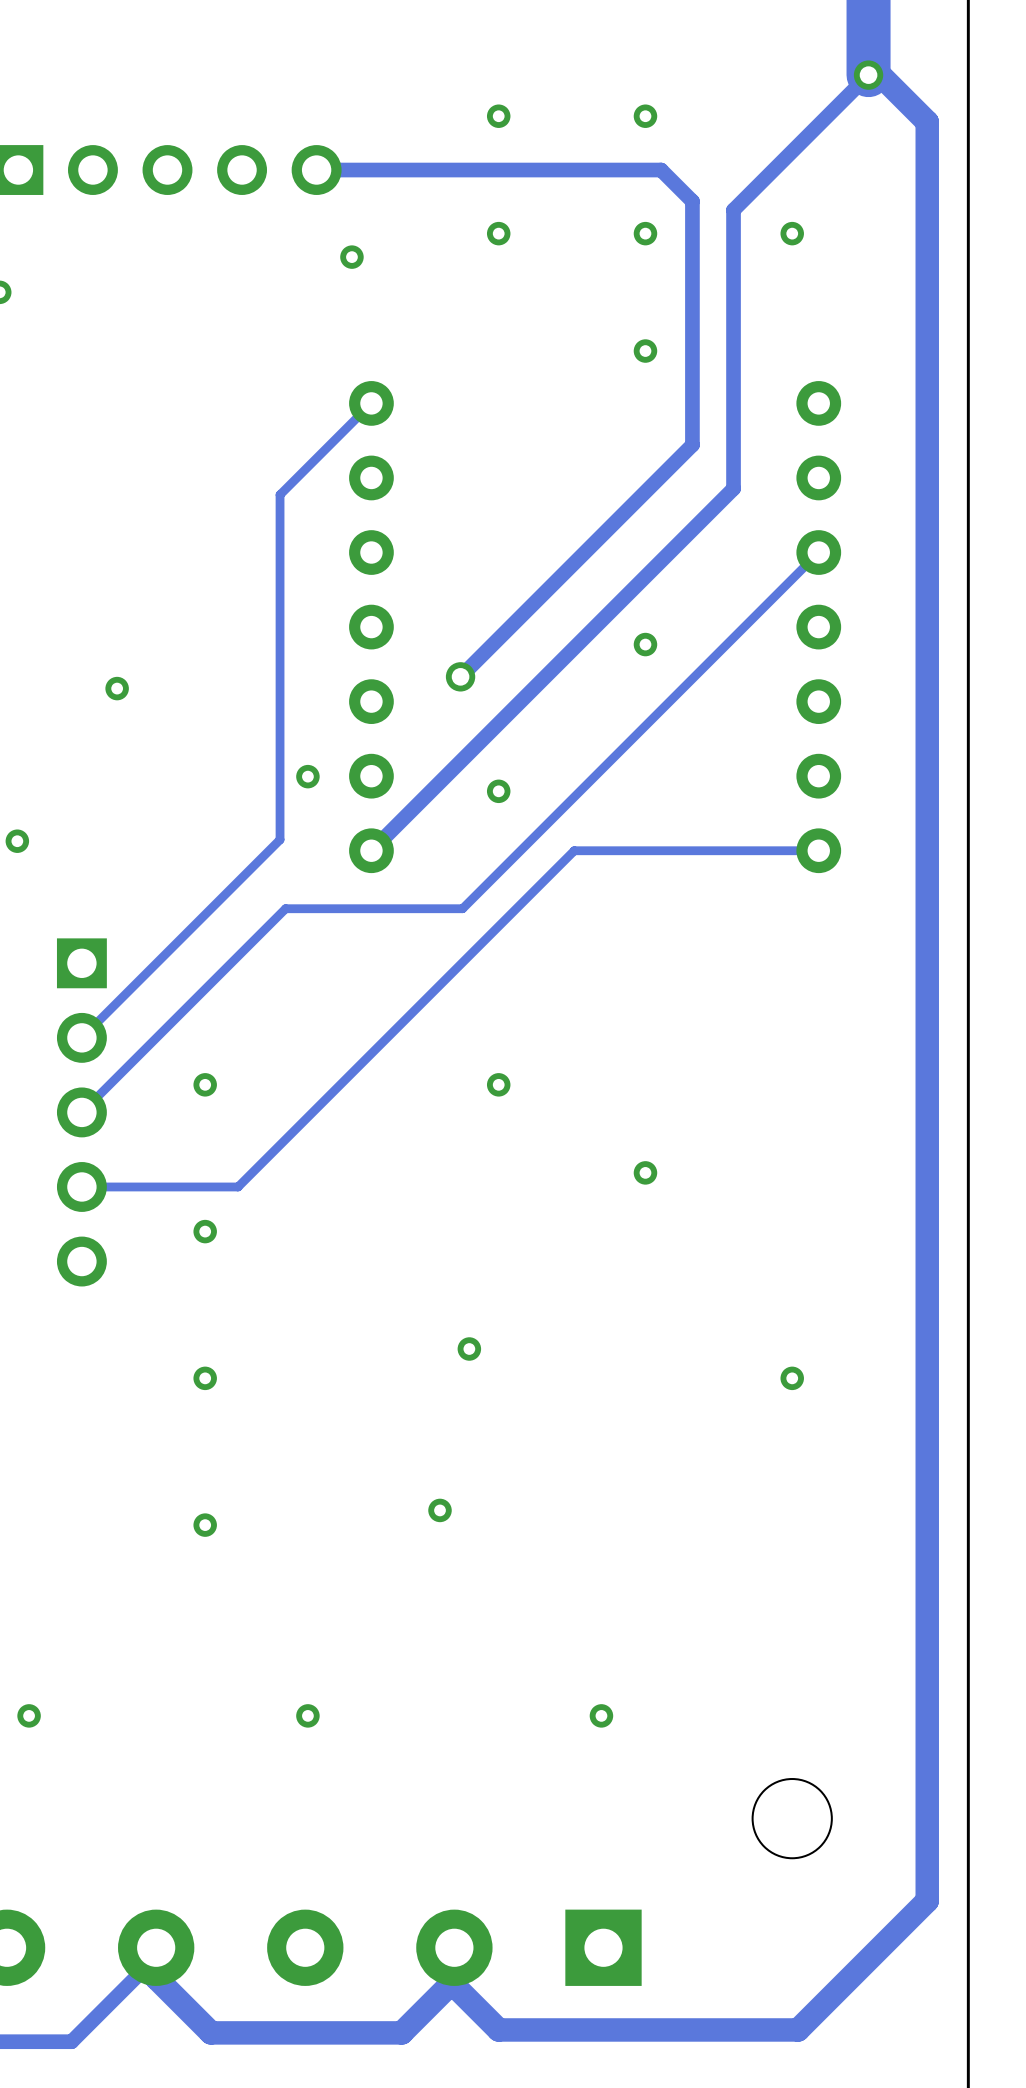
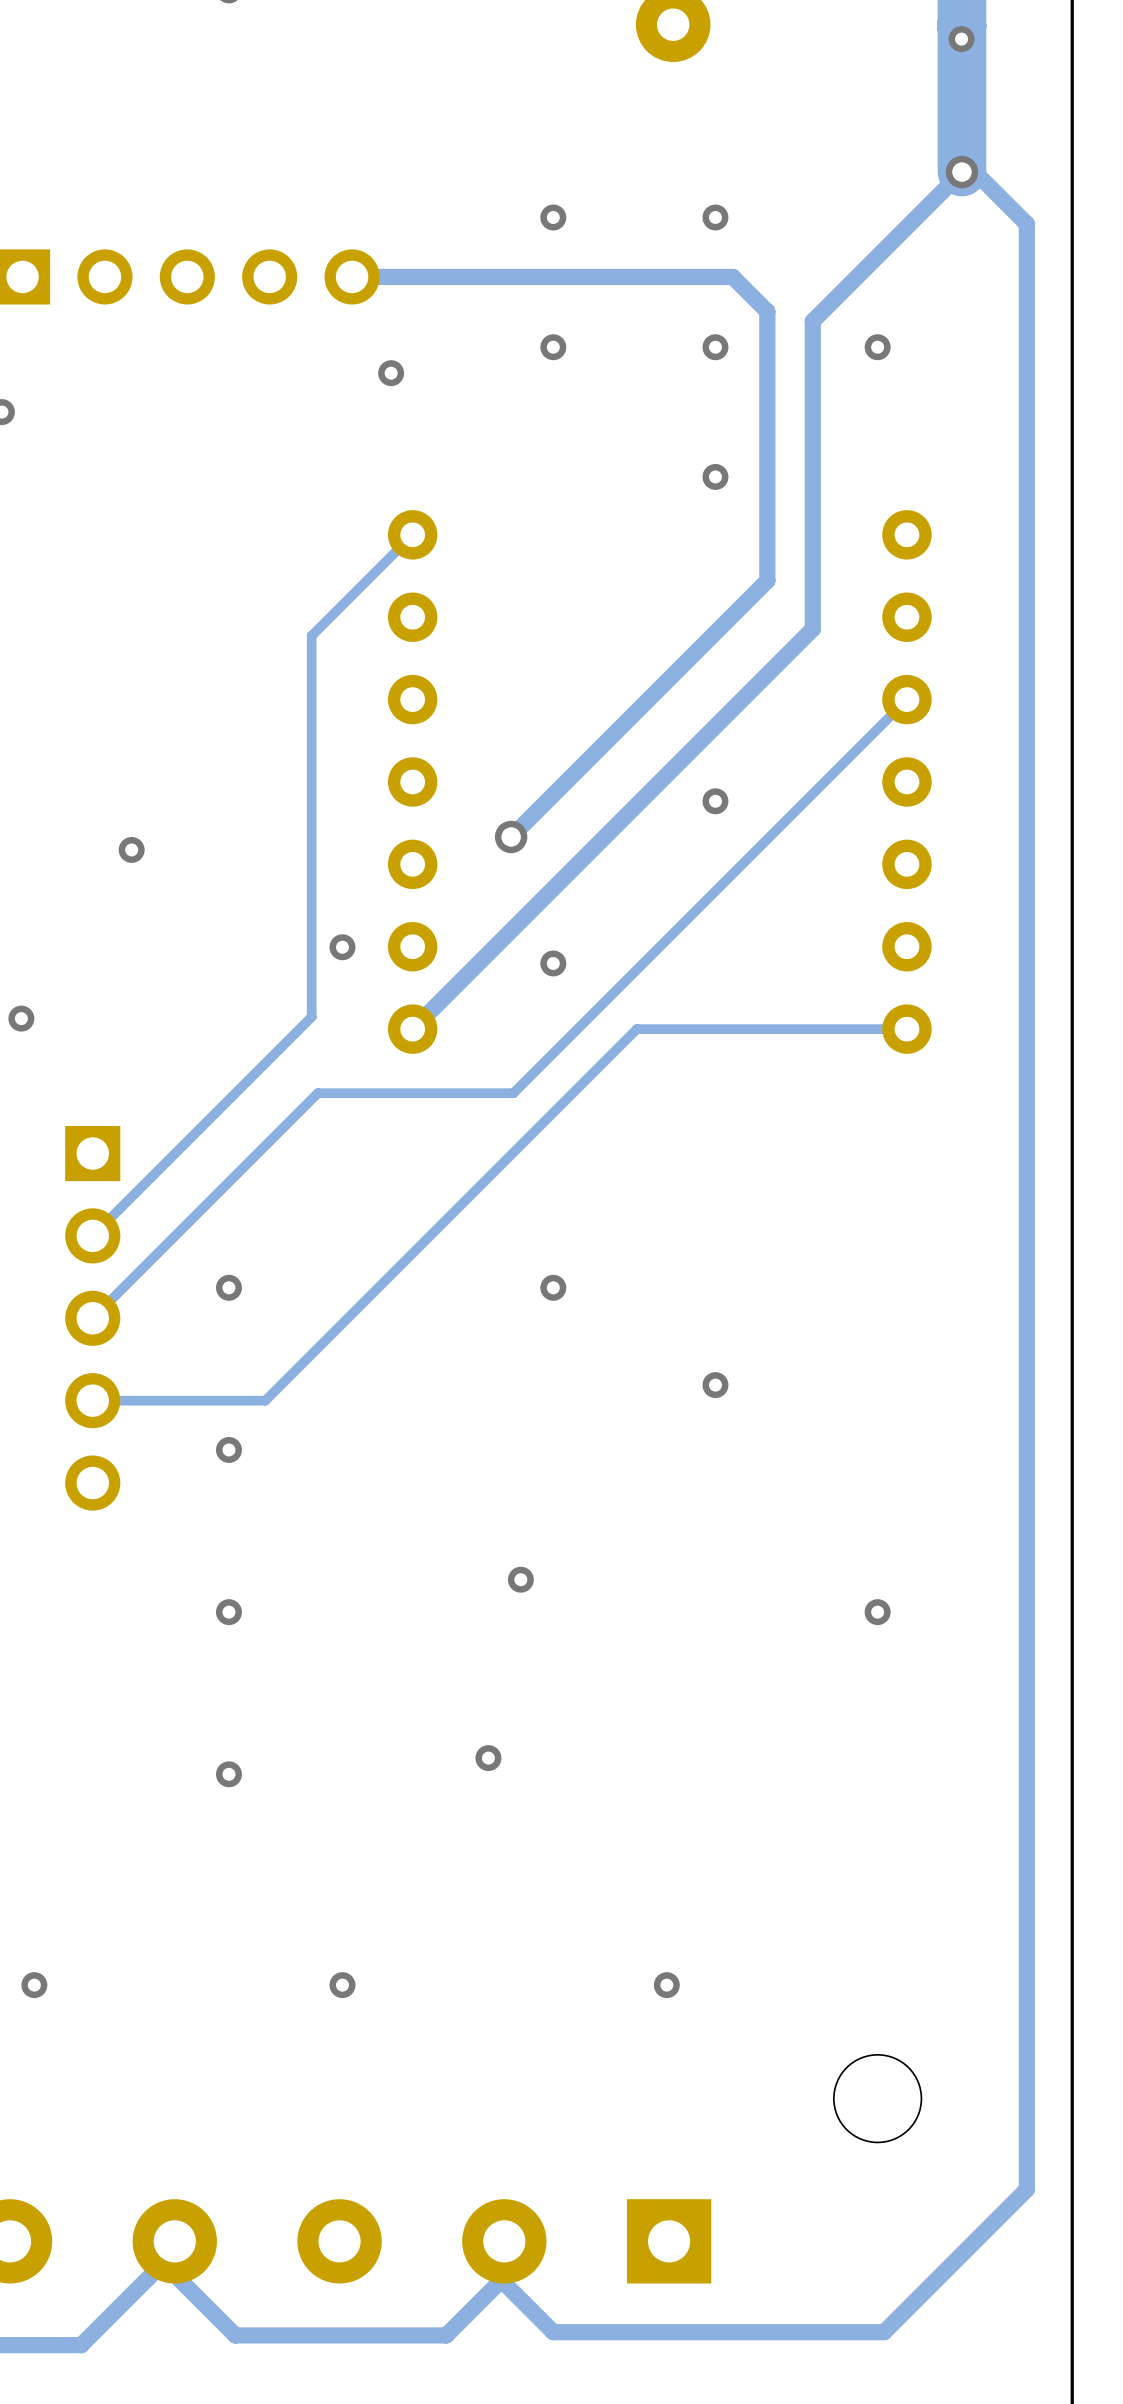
track width: thick (868, 75) (880, 75) (927, 122) (927, 1900) (798, 2029) (498, 2029) (454, 1985) (454, 1957) -> thin (961, 172) (974, 172) (1026, 223) (1026, 2189) (884, 2332) (553, 2332) (504, 2283) (504, 2251)
track width: thick (156, 1957) (156, 1978) (211, 2032) (401, 2032) (454, 1980) -> thin (174, 2251) (174, 2274) (235, 2335) (446, 2335) (504, 2277)

